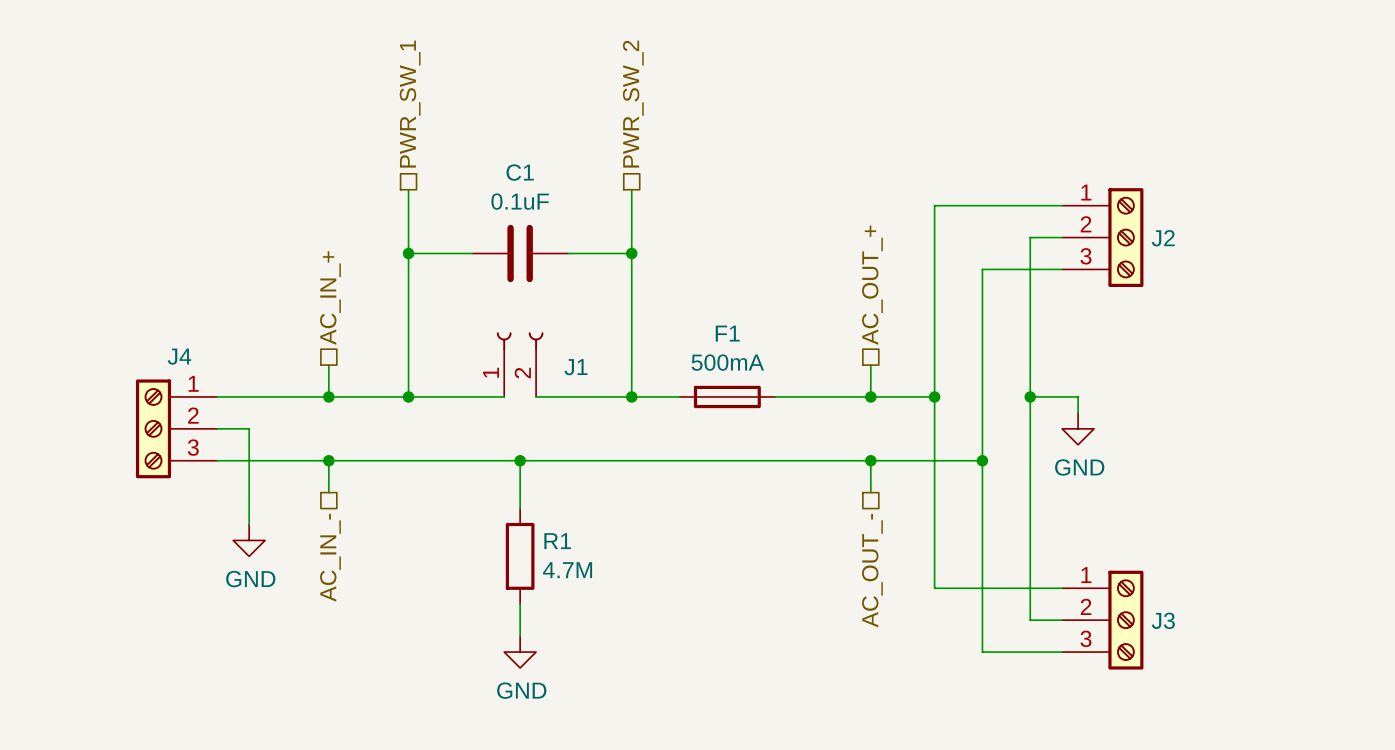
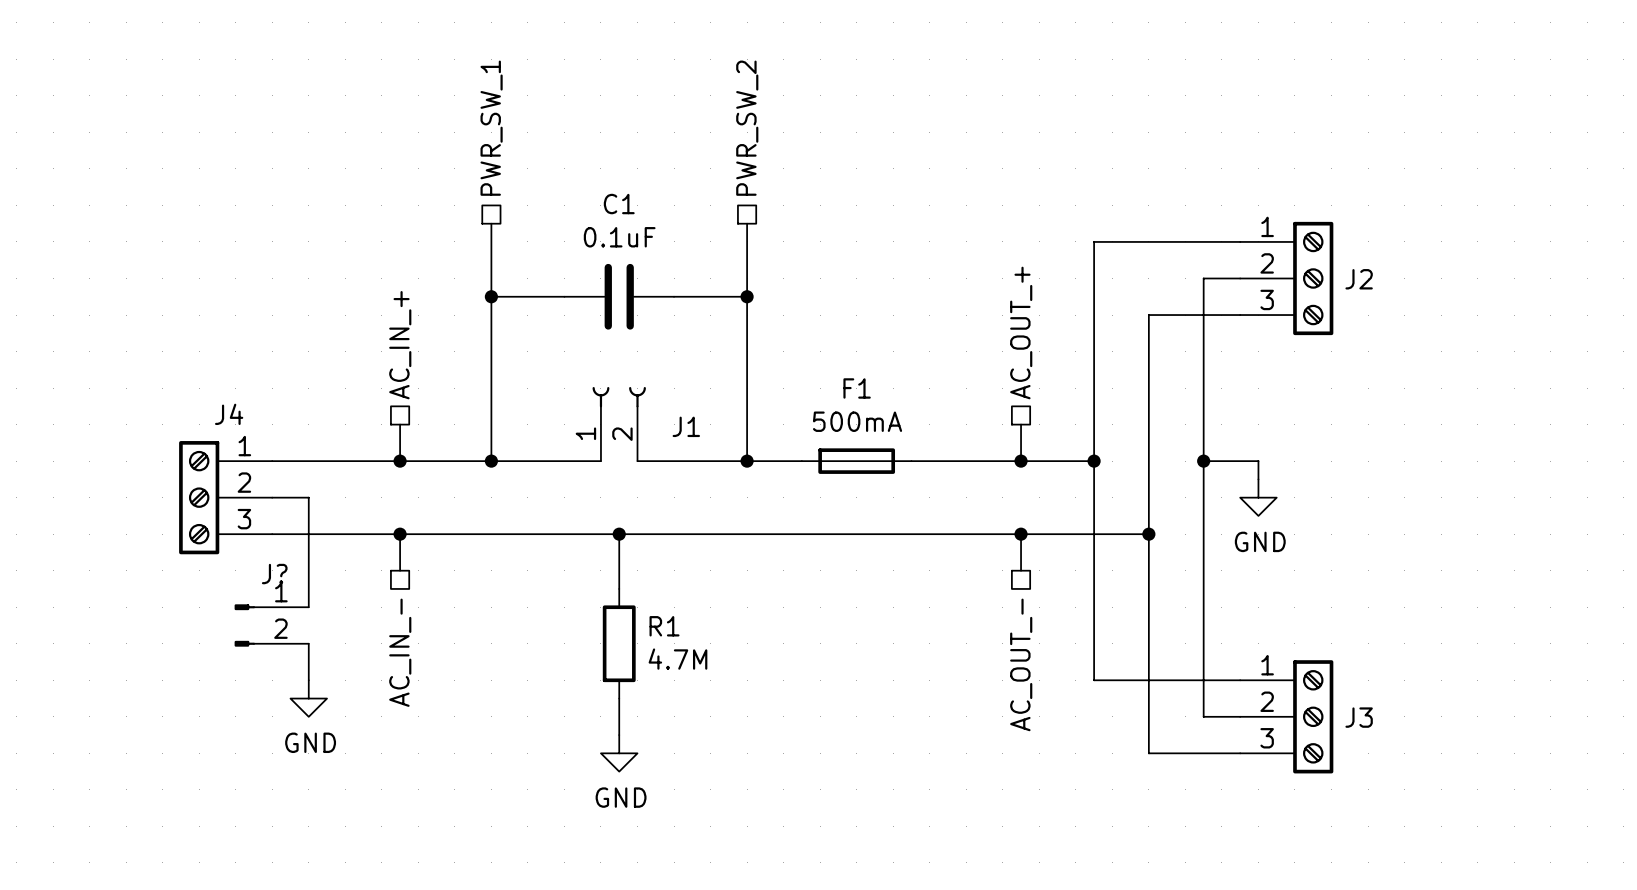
J?: none -> (271, 625)
power symbol position: GND (249, 540) -> GND (308, 698)
wire: none -> (308, 643) (308, 680)

